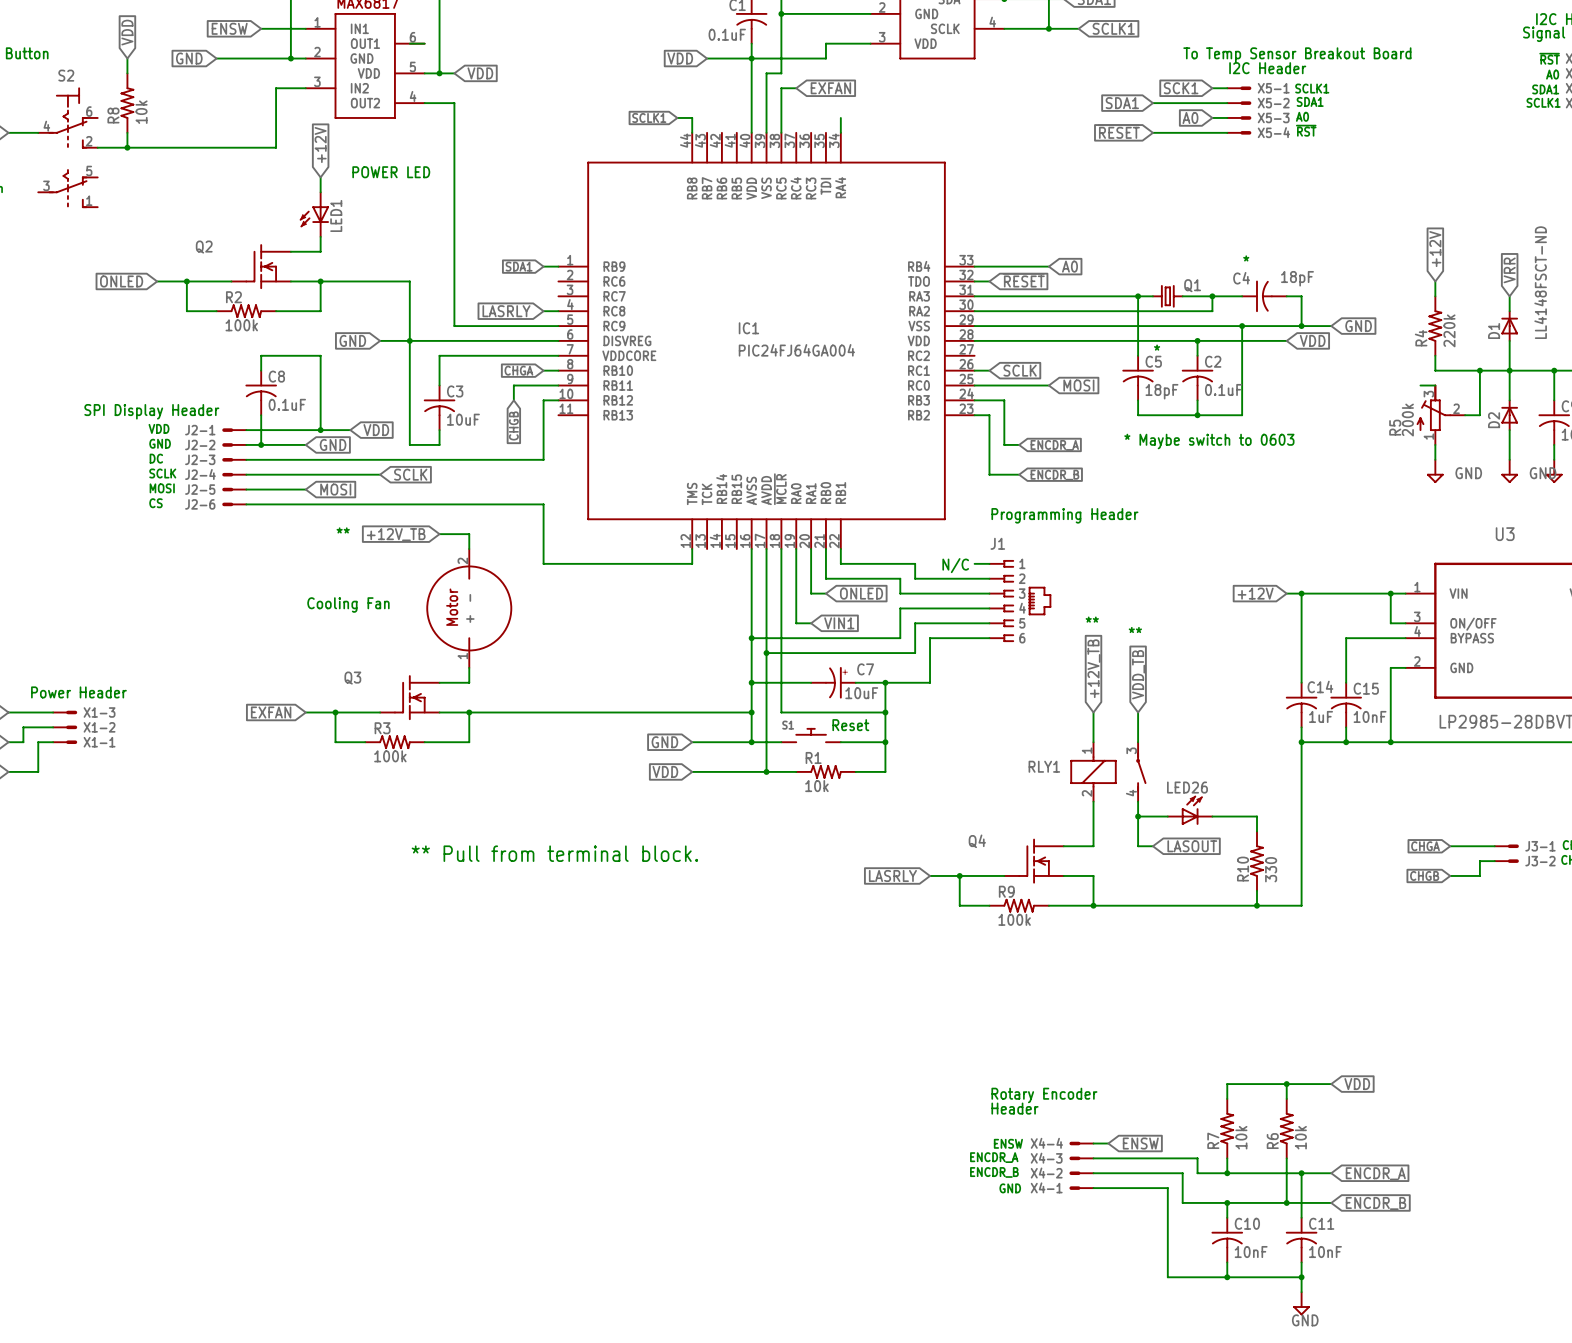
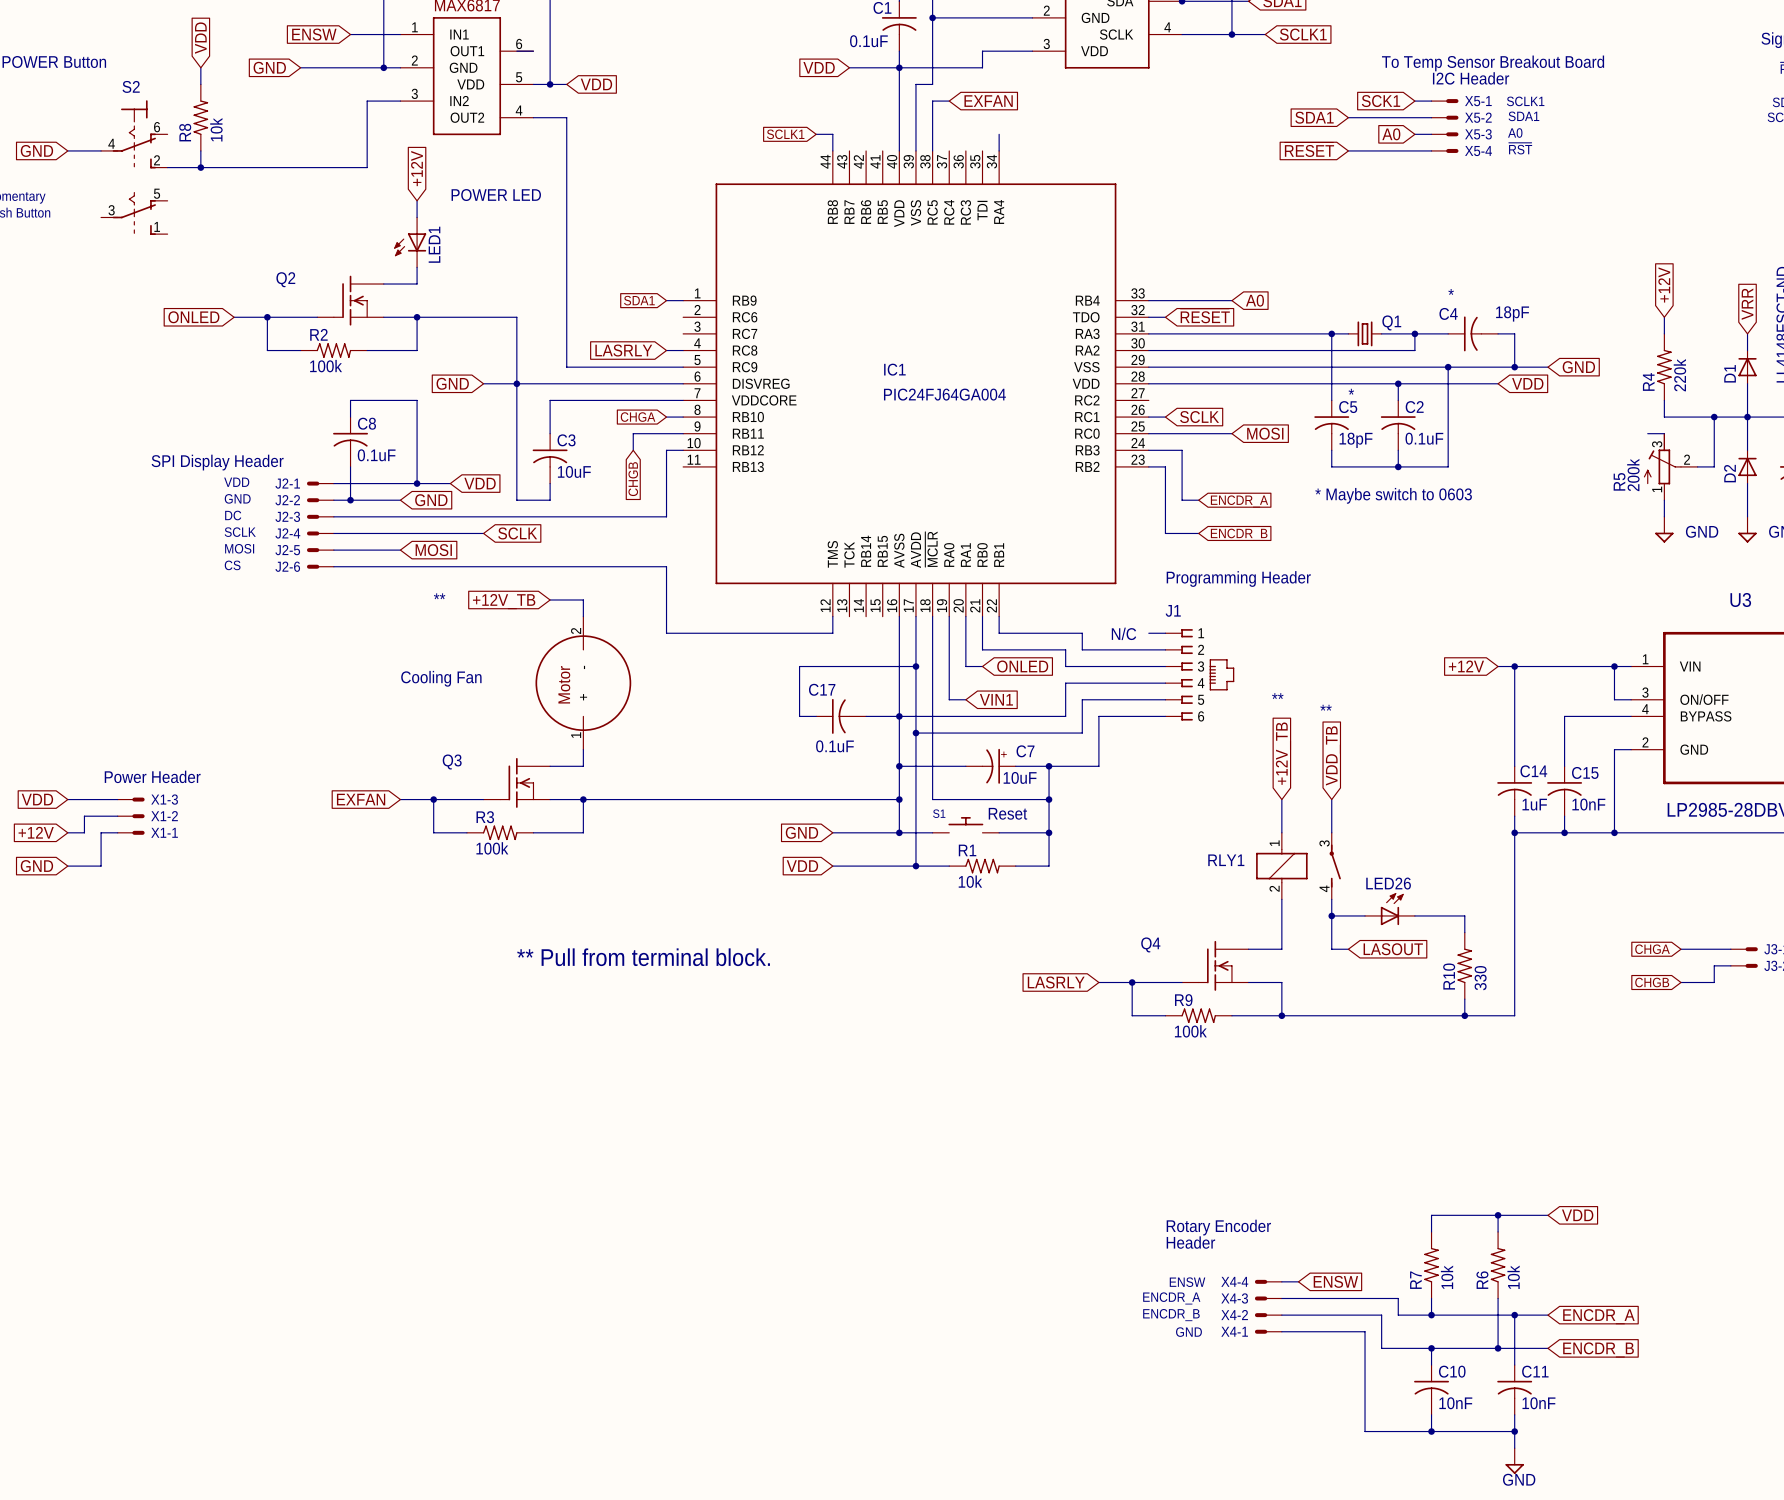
wire: none -> (915, 666) (799, 666) (799, 716) (816, 716)
junction: none -> (915, 666)
C17: none -> 0.1uF (841, 716)
wire: none -> (866, 716) (899, 716)

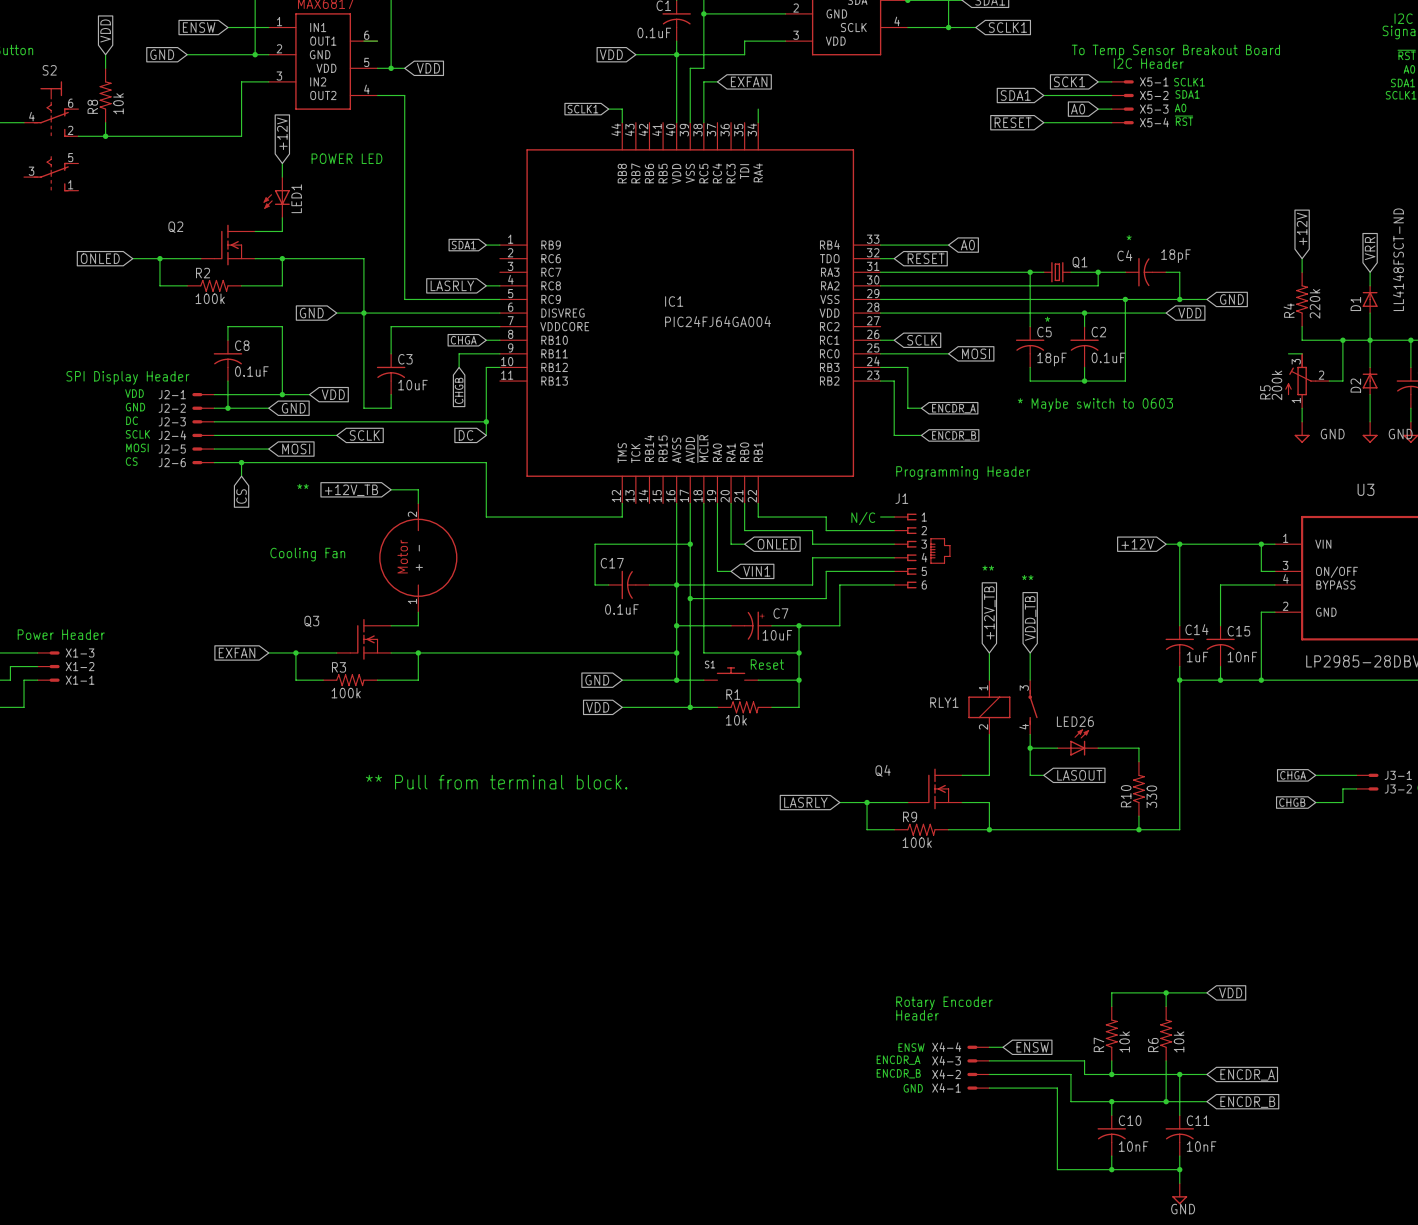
wire: none -> (486, 421) (486, 435)
junction: none -> (486, 421)
global label: none -> DC (466, 435)
wire: none -> (241, 462) (241, 476)
junction: none -> (241, 462)
global label: none -> CS (241, 496)

